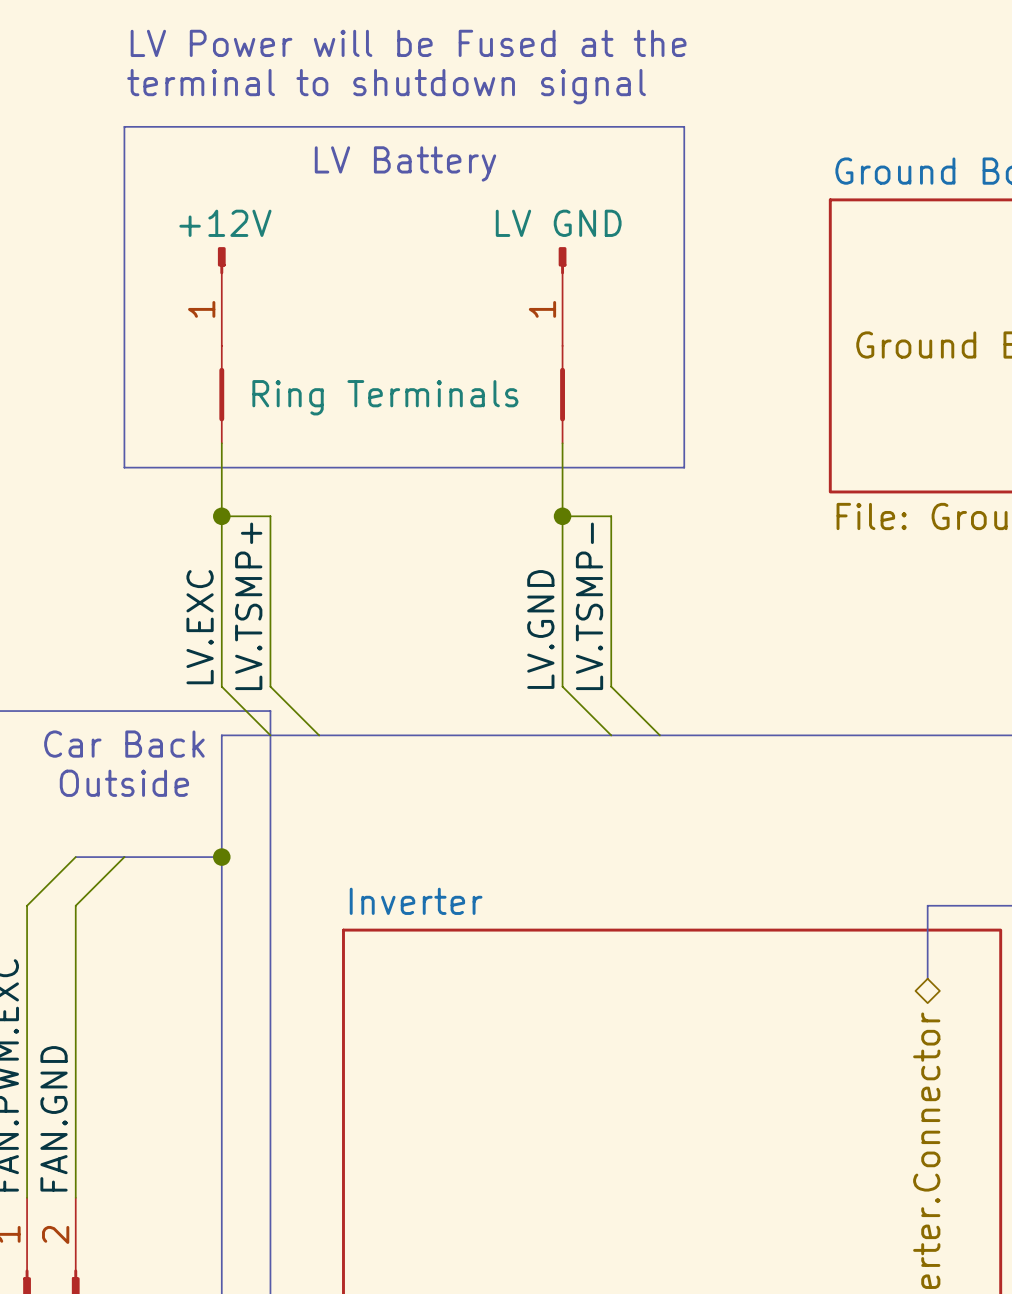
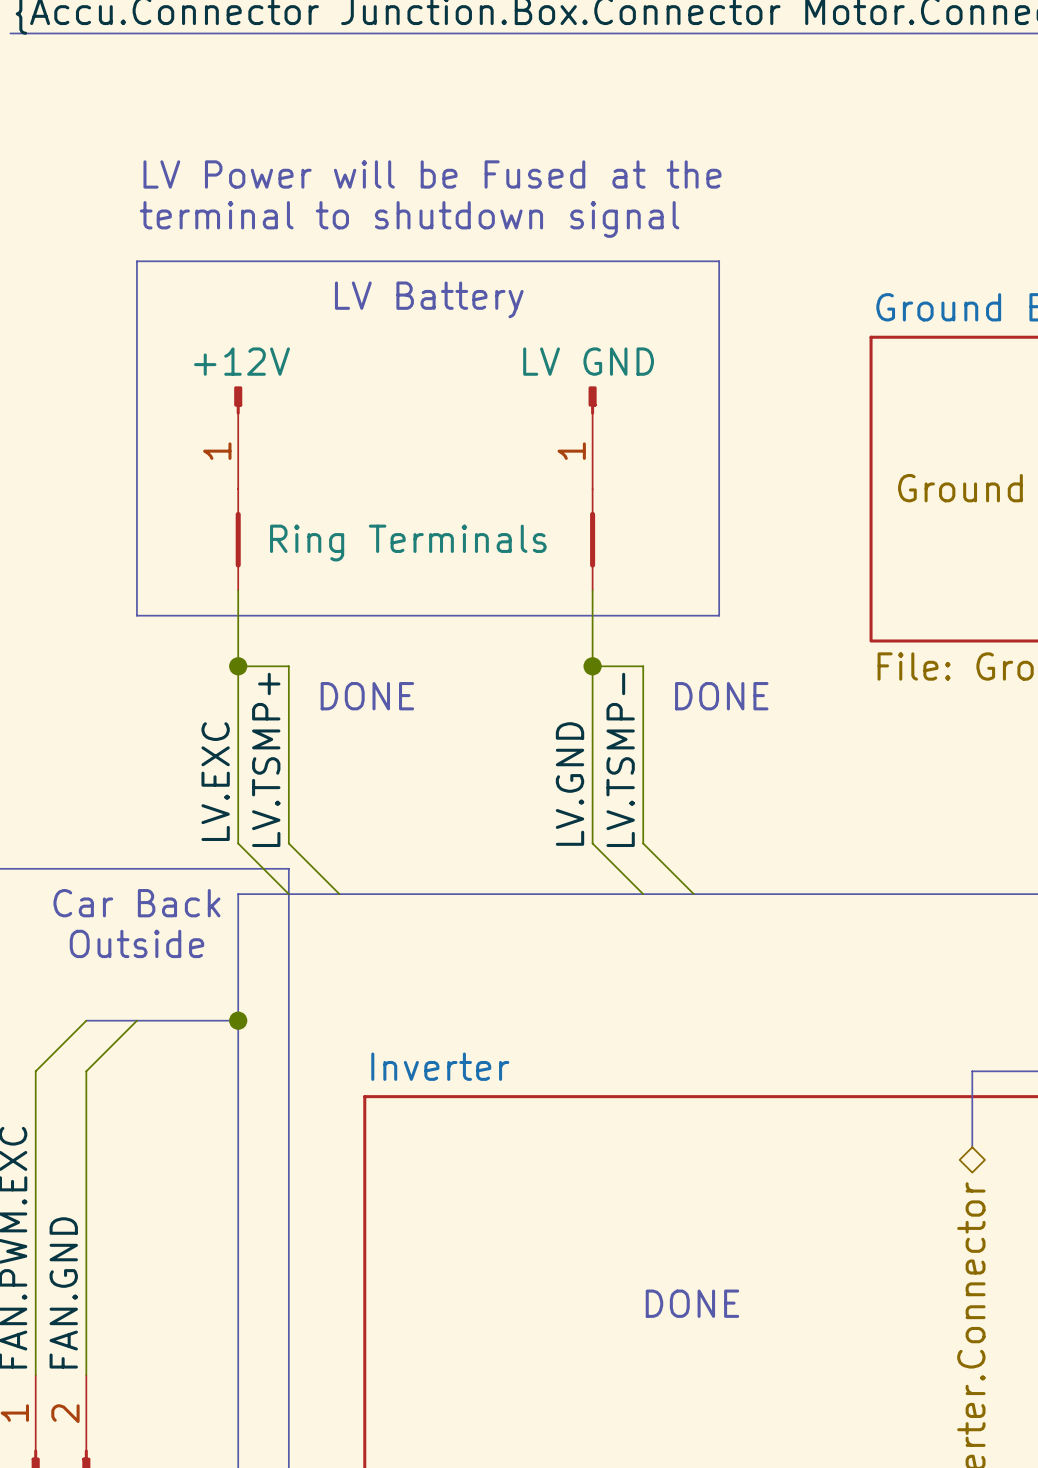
text: none -> DONE (367, 696)
text: none -> DONE (721, 696)
text: none -> DONE (692, 1303)

